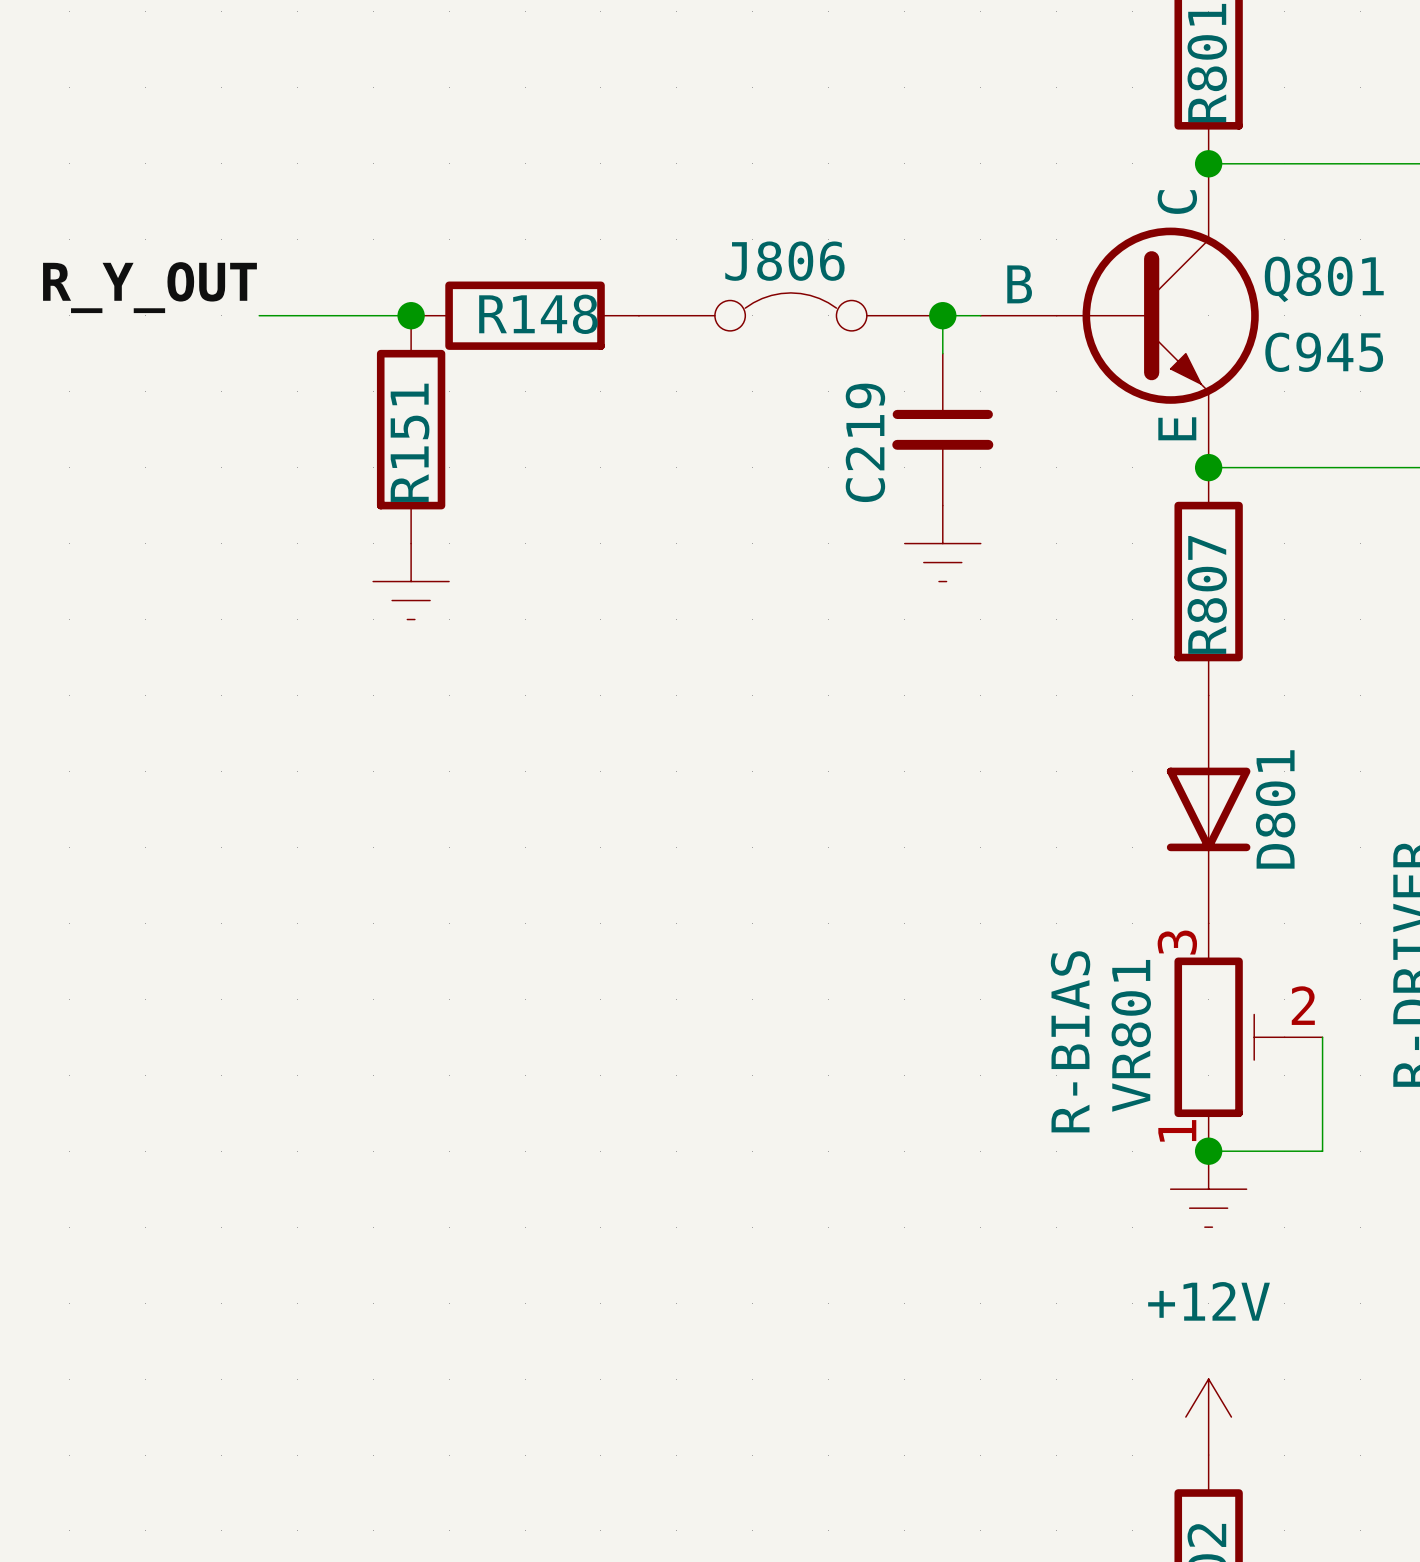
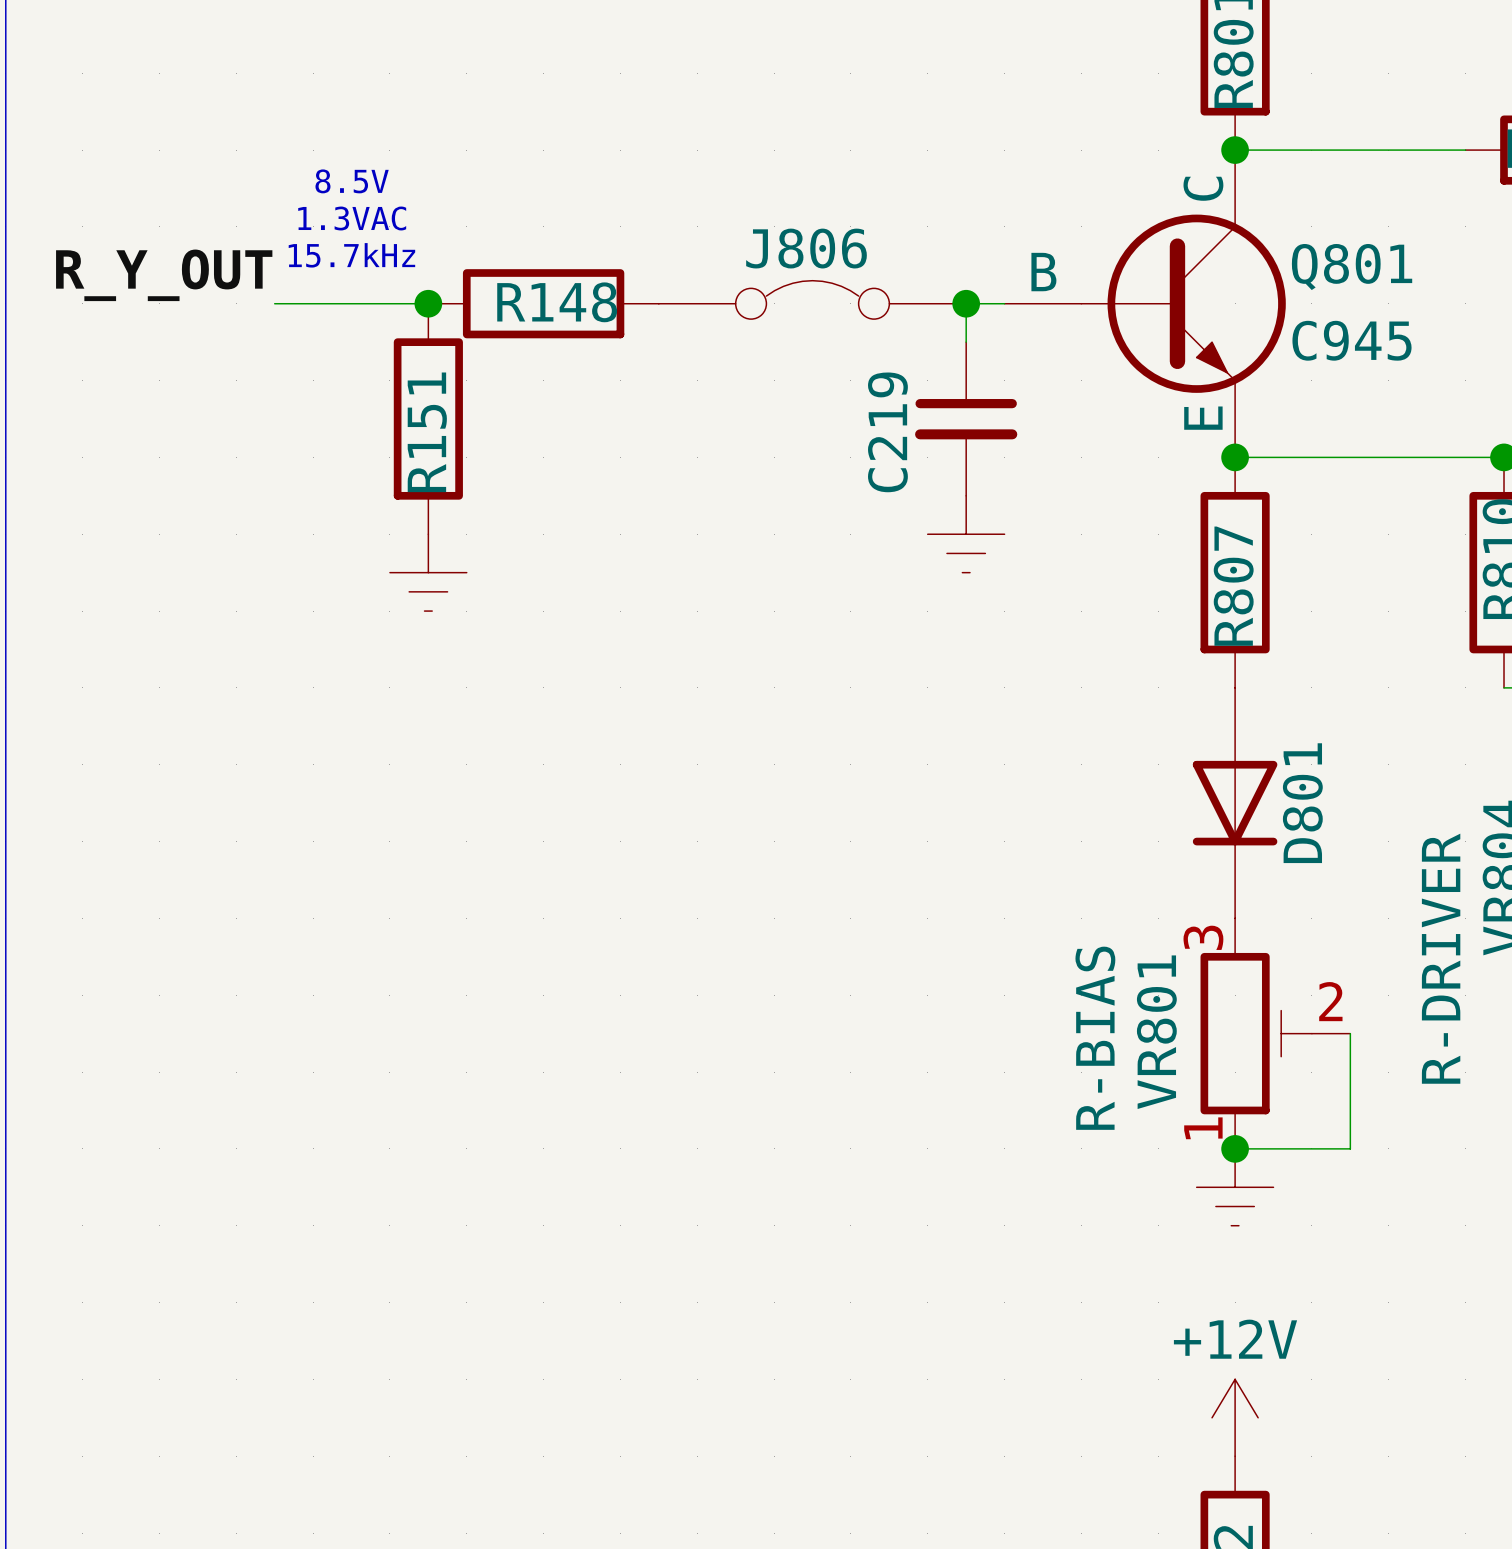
text: none -> 8.5V (352, 181)
text: none -> 1.3VAC (352, 218)
text: none -> 15.7kHz (351, 255)
power symbol text position: +12V (1209, 1301) -> +12V (1235, 1339)

